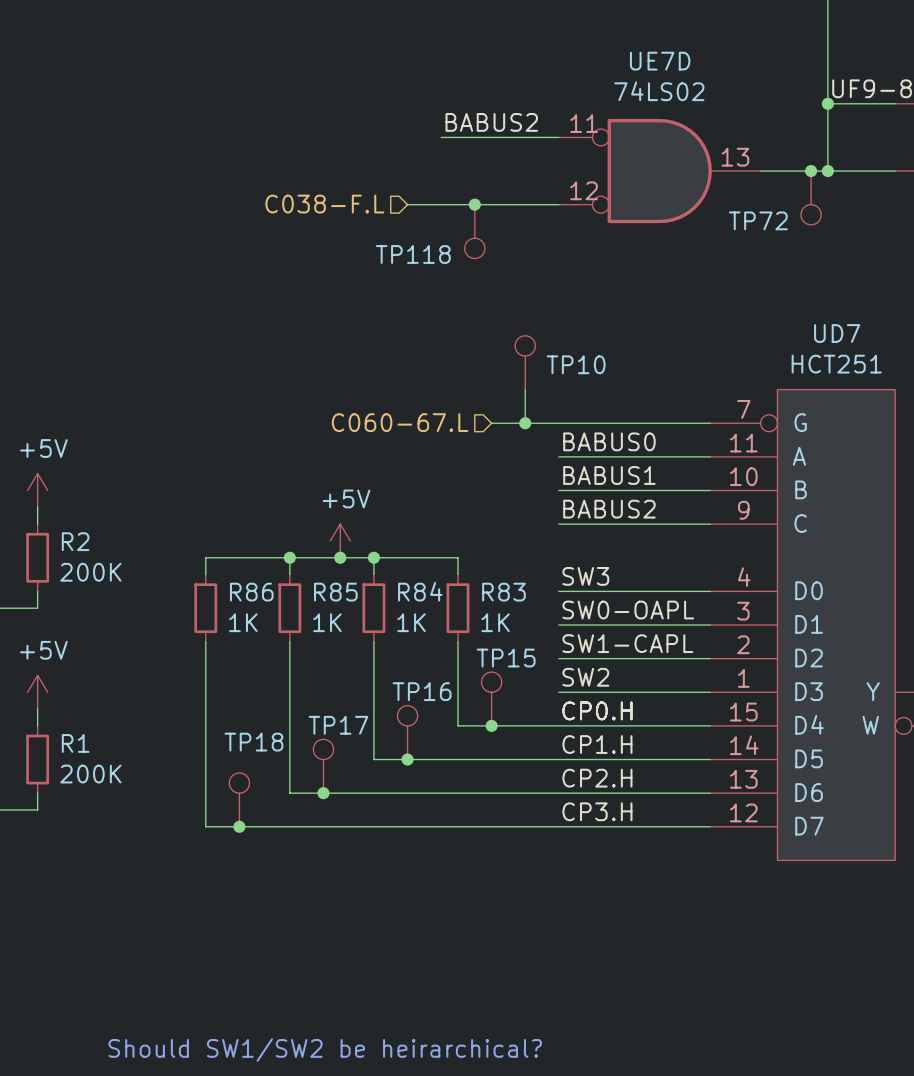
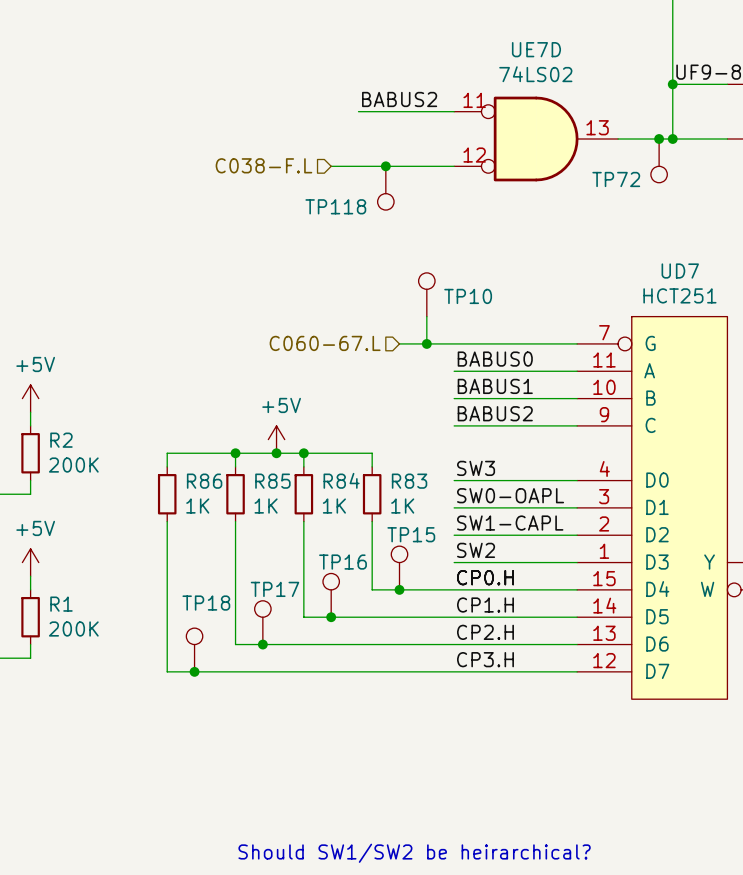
text position: Should SW1/SW2 be heirarchical? (325, 1050) -> Should SW1/SW2 be heirarchical? (414, 853)

